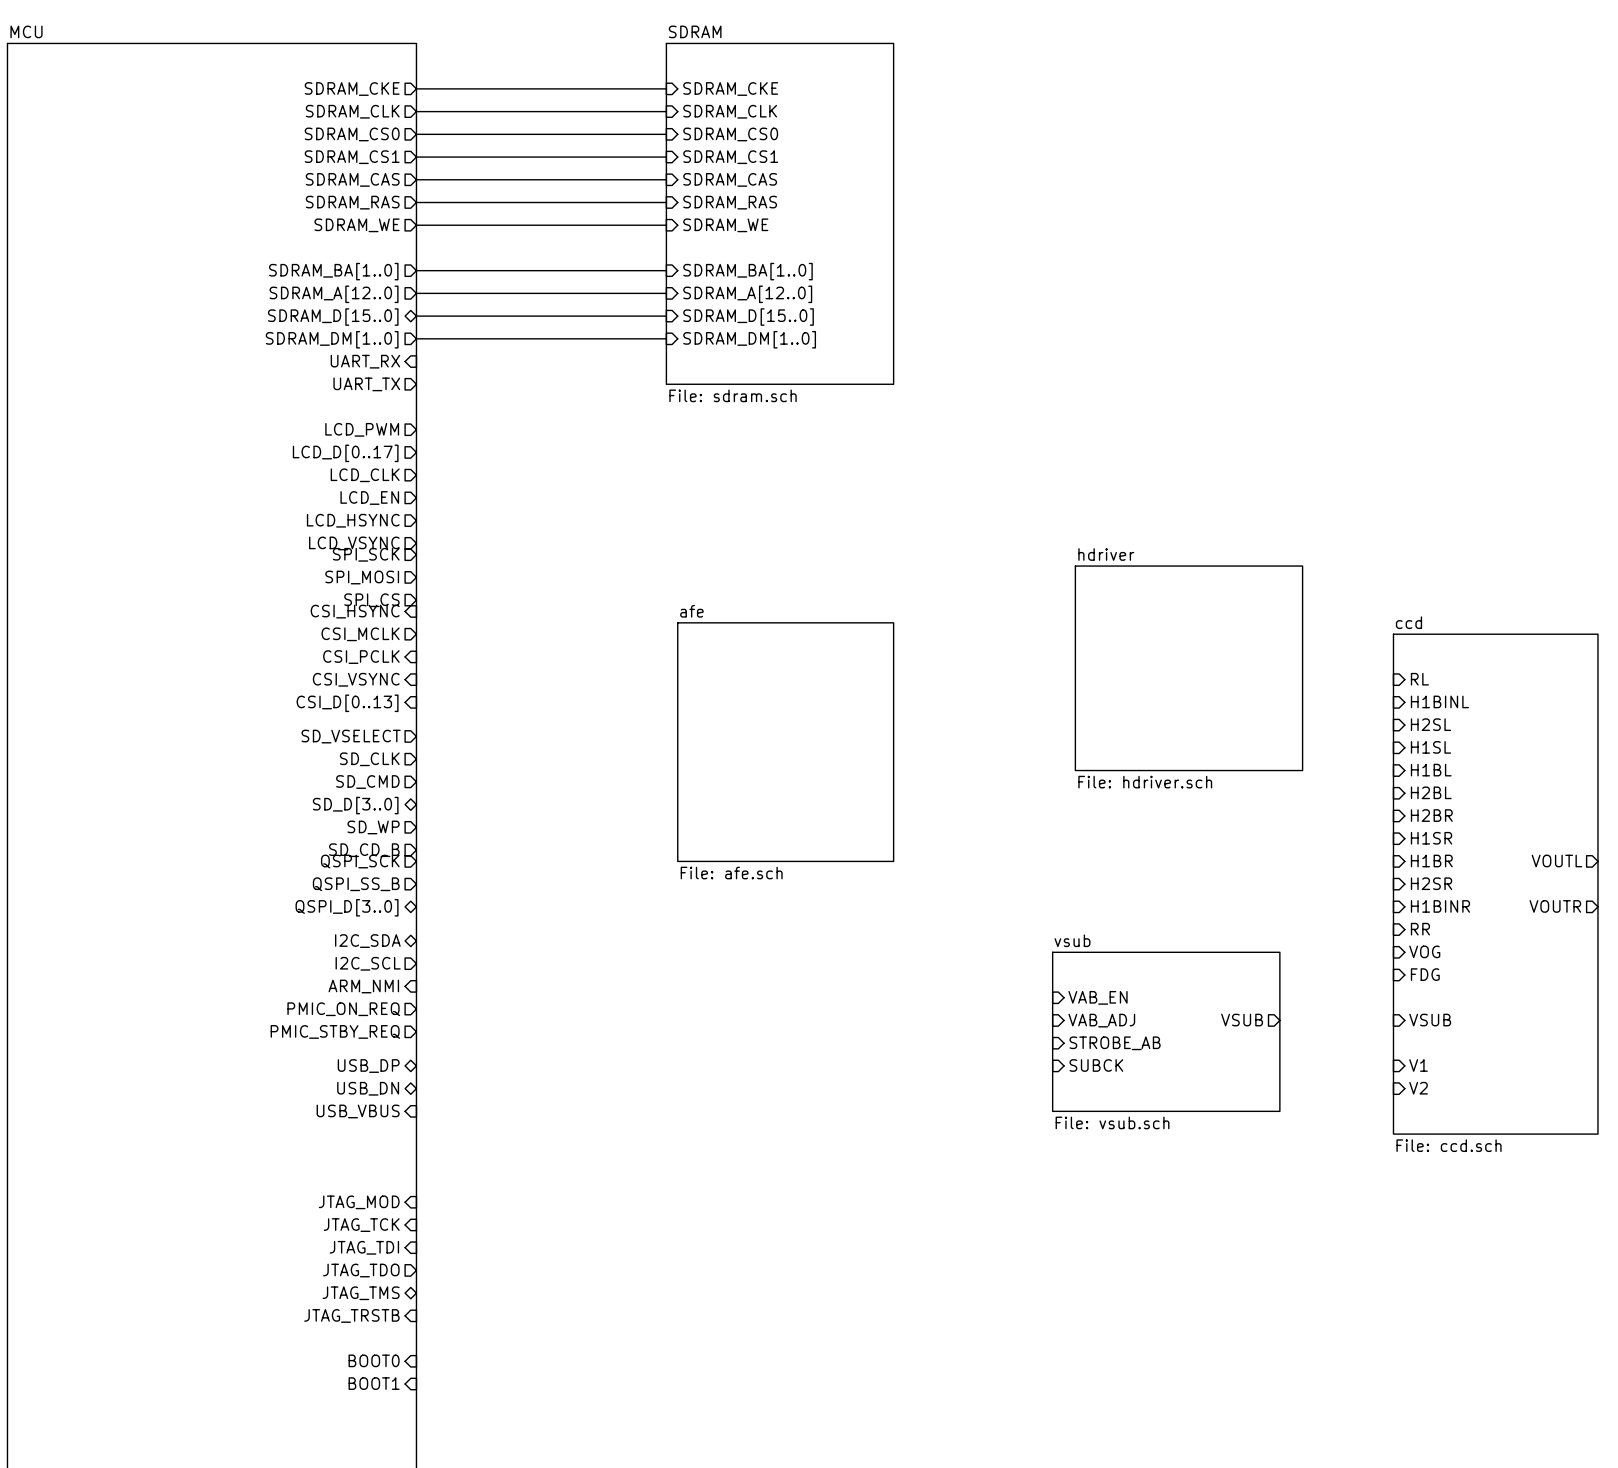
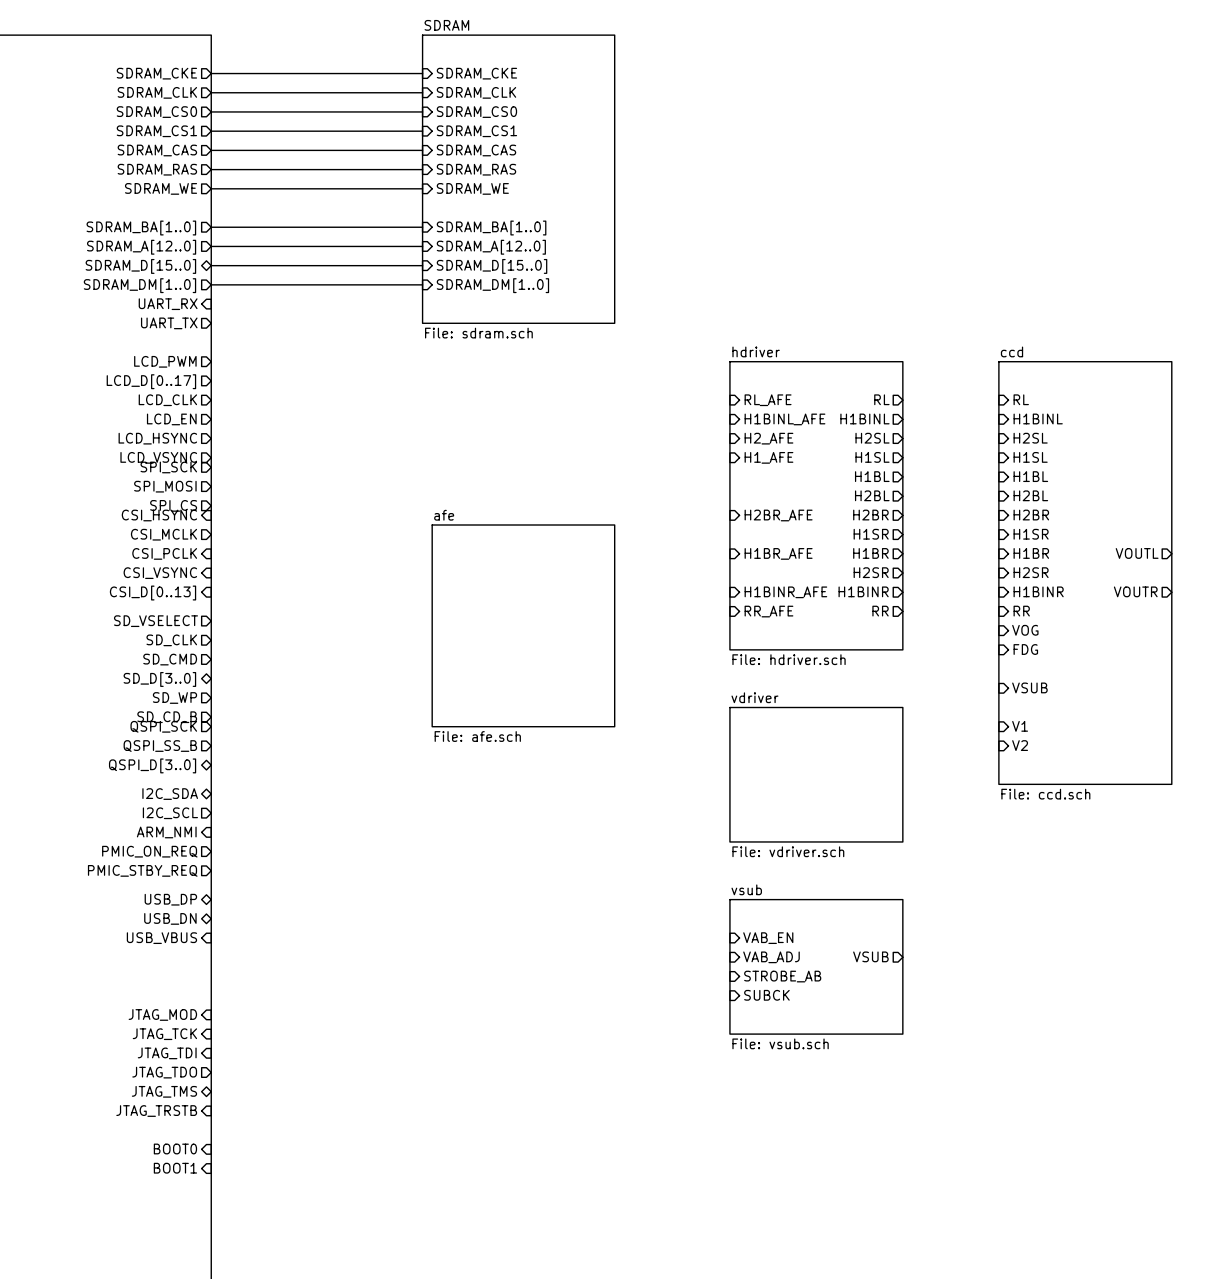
sheet pin: none -> RL (881, 399)
sheet pin: none -> RL (1021, 399)
sheet pin: none -> RL_AFE (768, 400)
sheet pin: none -> H1BINL_AFE (784, 419)
sheet pin: none -> H1BINL (864, 418)
sheet pin: none -> H1BINL (1038, 418)
sheet pin: none -> H2_AFE (768, 438)
sheet pin: none -> H2SL (872, 438)
sheet pin: none -> H2SL (1030, 438)
sheet pin: none -> H1SL (872, 457)
sheet pin: none -> H1SL (1030, 457)
sheet pin: none -> H1_AFE (768, 457)
sheet pin: none -> H1BL (872, 476)
sheet pin: none -> H1BL (1030, 476)
sheet pin: none -> H2BL (872, 495)
sheet pin: none -> H2BL (1030, 495)
sheet hdriver: none -> File: hdriver.sch (816, 505)
sheet pin: none -> H2BR_AFE (778, 515)
sheet pin: none -> H2BR (870, 515)
sheet pin: none -> H2BR (1031, 515)
sheet pin: none -> H1SR (871, 534)
sheet pin: none -> H1SR (1031, 534)
sheet pin: none -> H1BR (870, 553)
sheet pin: none -> H1BR (1031, 553)
sheet pin: none -> H1BR_AFE (778, 553)
sheet hdriver: File: hdriver.sch (1188, 668) -> none
sheet pin: none -> H2SR (871, 572)
sheet pin: none -> H2SR (1031, 572)
sheet pin: RL (1419, 679) -> none
sheet pin: none -> H1BINR (863, 591)
sheet pin: H1BINL (1439, 701) -> H1BINR (1038, 591)
sheet pin: none -> H1BINR_AFE (785, 592)
sheet pin: none -> RR (880, 611)
sheet pin: none -> RR (1021, 611)
sheet pin: H2SL (1430, 724) -> none
sheet pin: none -> RR_AFE (768, 611)
sheet pin: H1SL (1430, 747) -> none
sheet pin: H1BL (1431, 770) -> none
sheet pin: H2BL (1431, 792) -> none
sheet pin: none -> VSUB (1029, 687)
sheet pin: H2BR (1431, 815) -> none
sheet pin: H1SR (1431, 838) -> none
sheet pin: H1BR (1431, 860) -> none
sheet pin position: VOUTL (1556, 860) -> VOUTL (1137, 553)
sheet pin: H2SR (1431, 883) -> none
sheet ccd position: (1495, 884) -> (1085, 573)
sheet pin: H1BINR (1440, 906) -> none
sheet pin position: VOUTR (1555, 906) -> VOUTR (1135, 591)
sheet vdriver: none -> File: vdriver.sch (816, 774)
sheet pin: RR (1420, 929) -> none
sheet pin position: VOG (1424, 951) -> VOG (1025, 630)
sheet pin position: FDG (1425, 974) -> FDG (1025, 649)
sheet pin position: VAB_EN (1098, 997) -> VAB_EN (768, 938)
sheet pin position: VAB_ADJ (1101, 1020) -> VAB_ADJ (771, 957)
sheet pin: VSUB (1242, 1020) -> none
sheet pin: VSUB (1430, 1020) -> none
sheet vsub: File: vsub.sch (1166, 1031) -> none
sheet pin position: STROBE_AB (1115, 1043) -> STROBE_AB (782, 976)
sheet pin position: SUBCK (1096, 1065) -> SUBCK (766, 995)
sheet pin position: V1 (1418, 1065) -> V1 (1020, 726)
sheet pin position: V2 (1418, 1088) -> V2 (1020, 745)
sheet pin: none -> VSUB (870, 956)
sheet vsub: none -> File: vsub.sch (816, 966)

